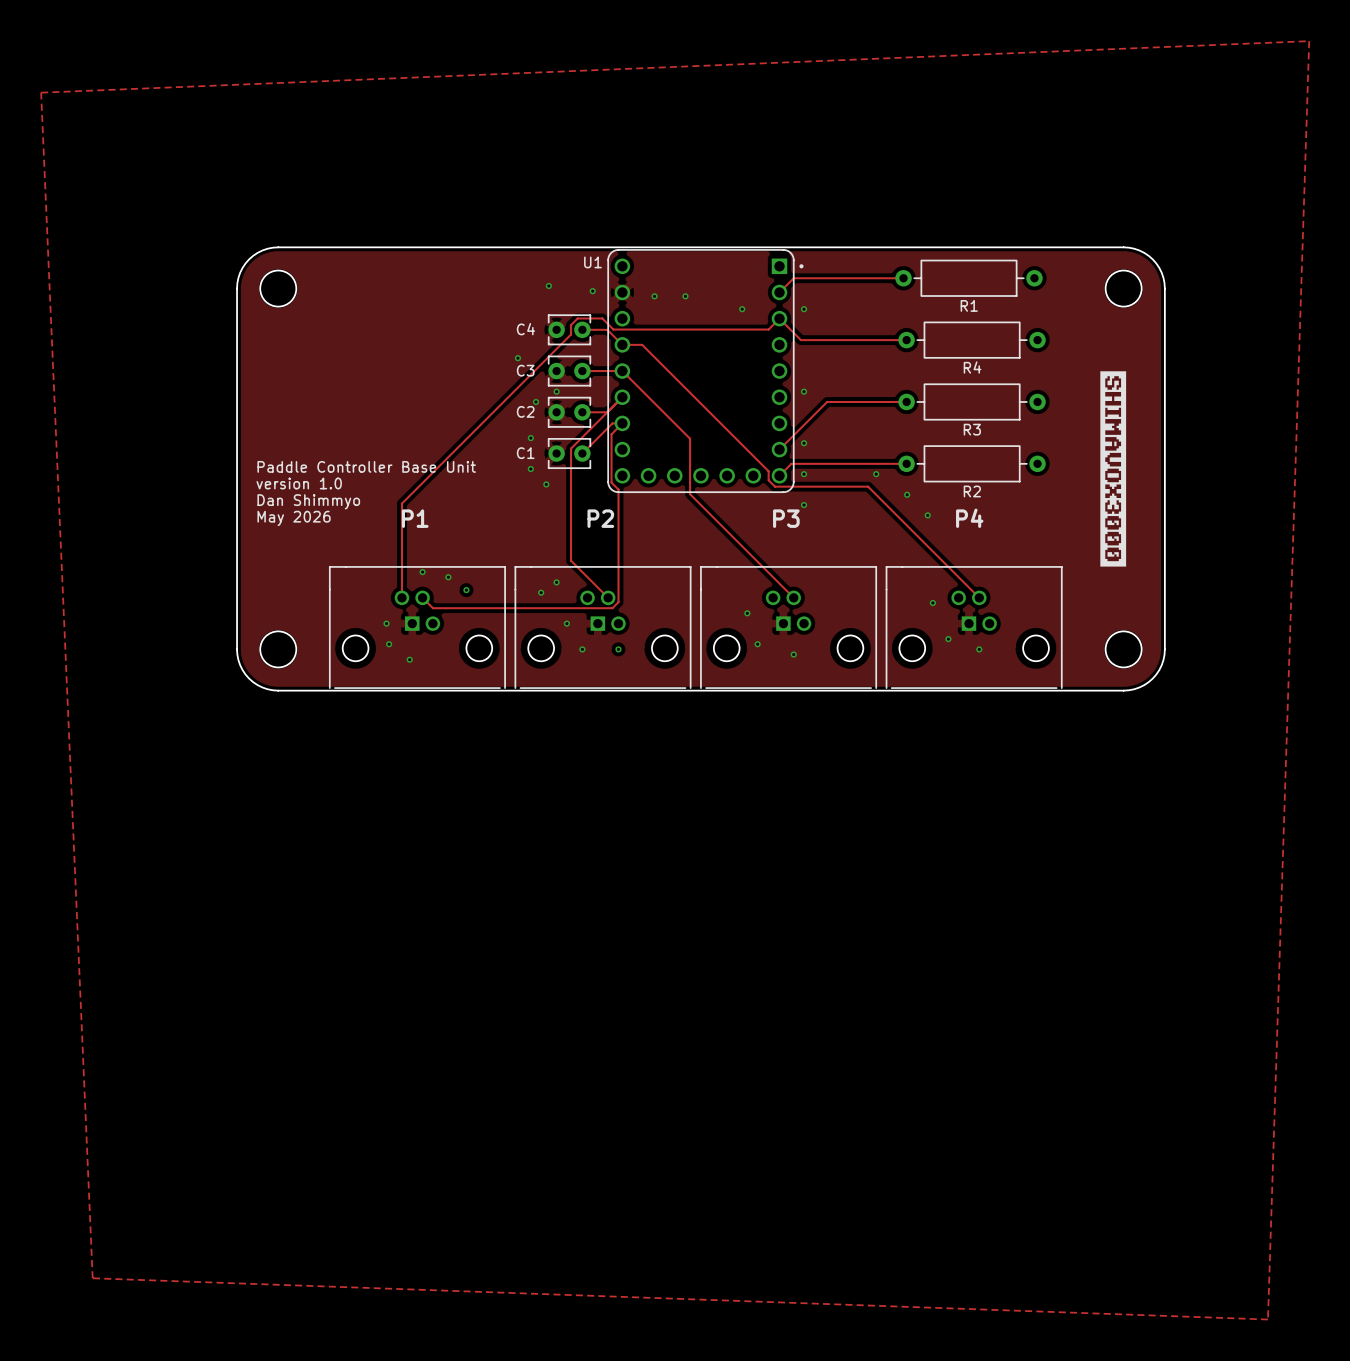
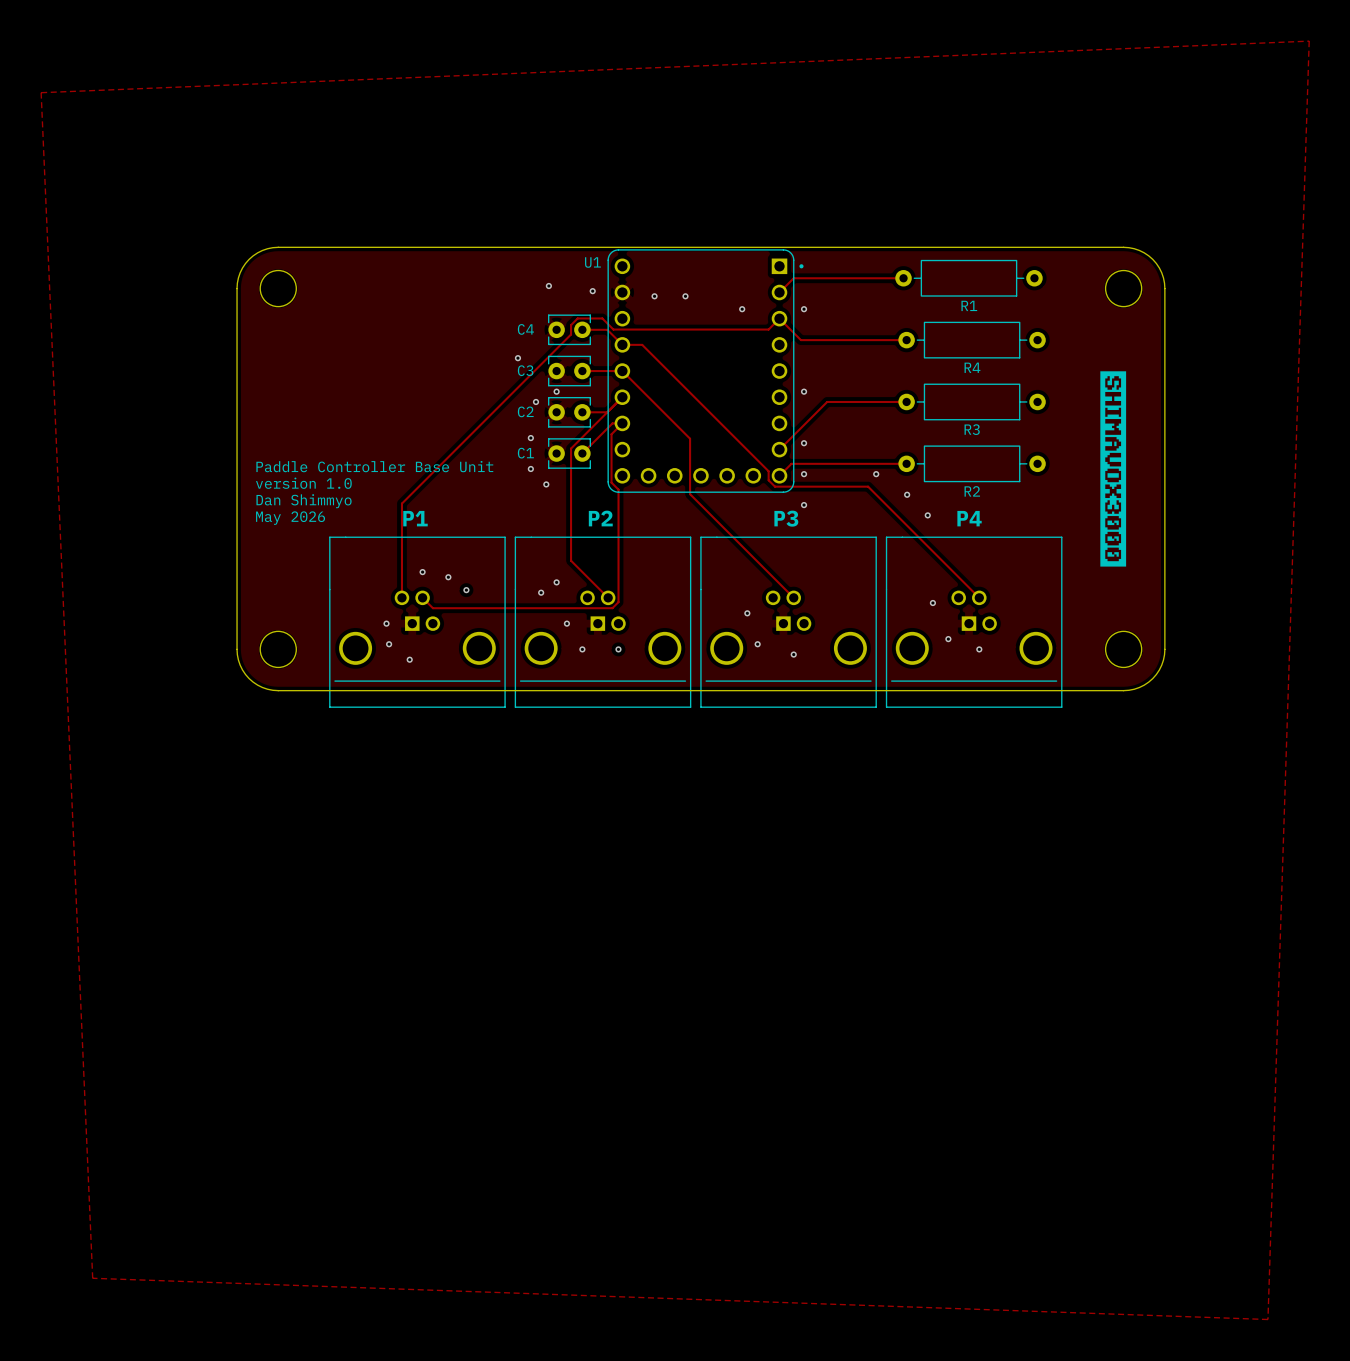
part footprint: [329, 566, 506, 689] -> [329, 536, 506, 708]
part footprint: [514, 566, 692, 689] -> [514, 536, 692, 708]
part footprint: [700, 566, 877, 689] -> [700, 536, 877, 708]
part footprint: [885, 566, 1063, 689] -> [885, 536, 1063, 708]

